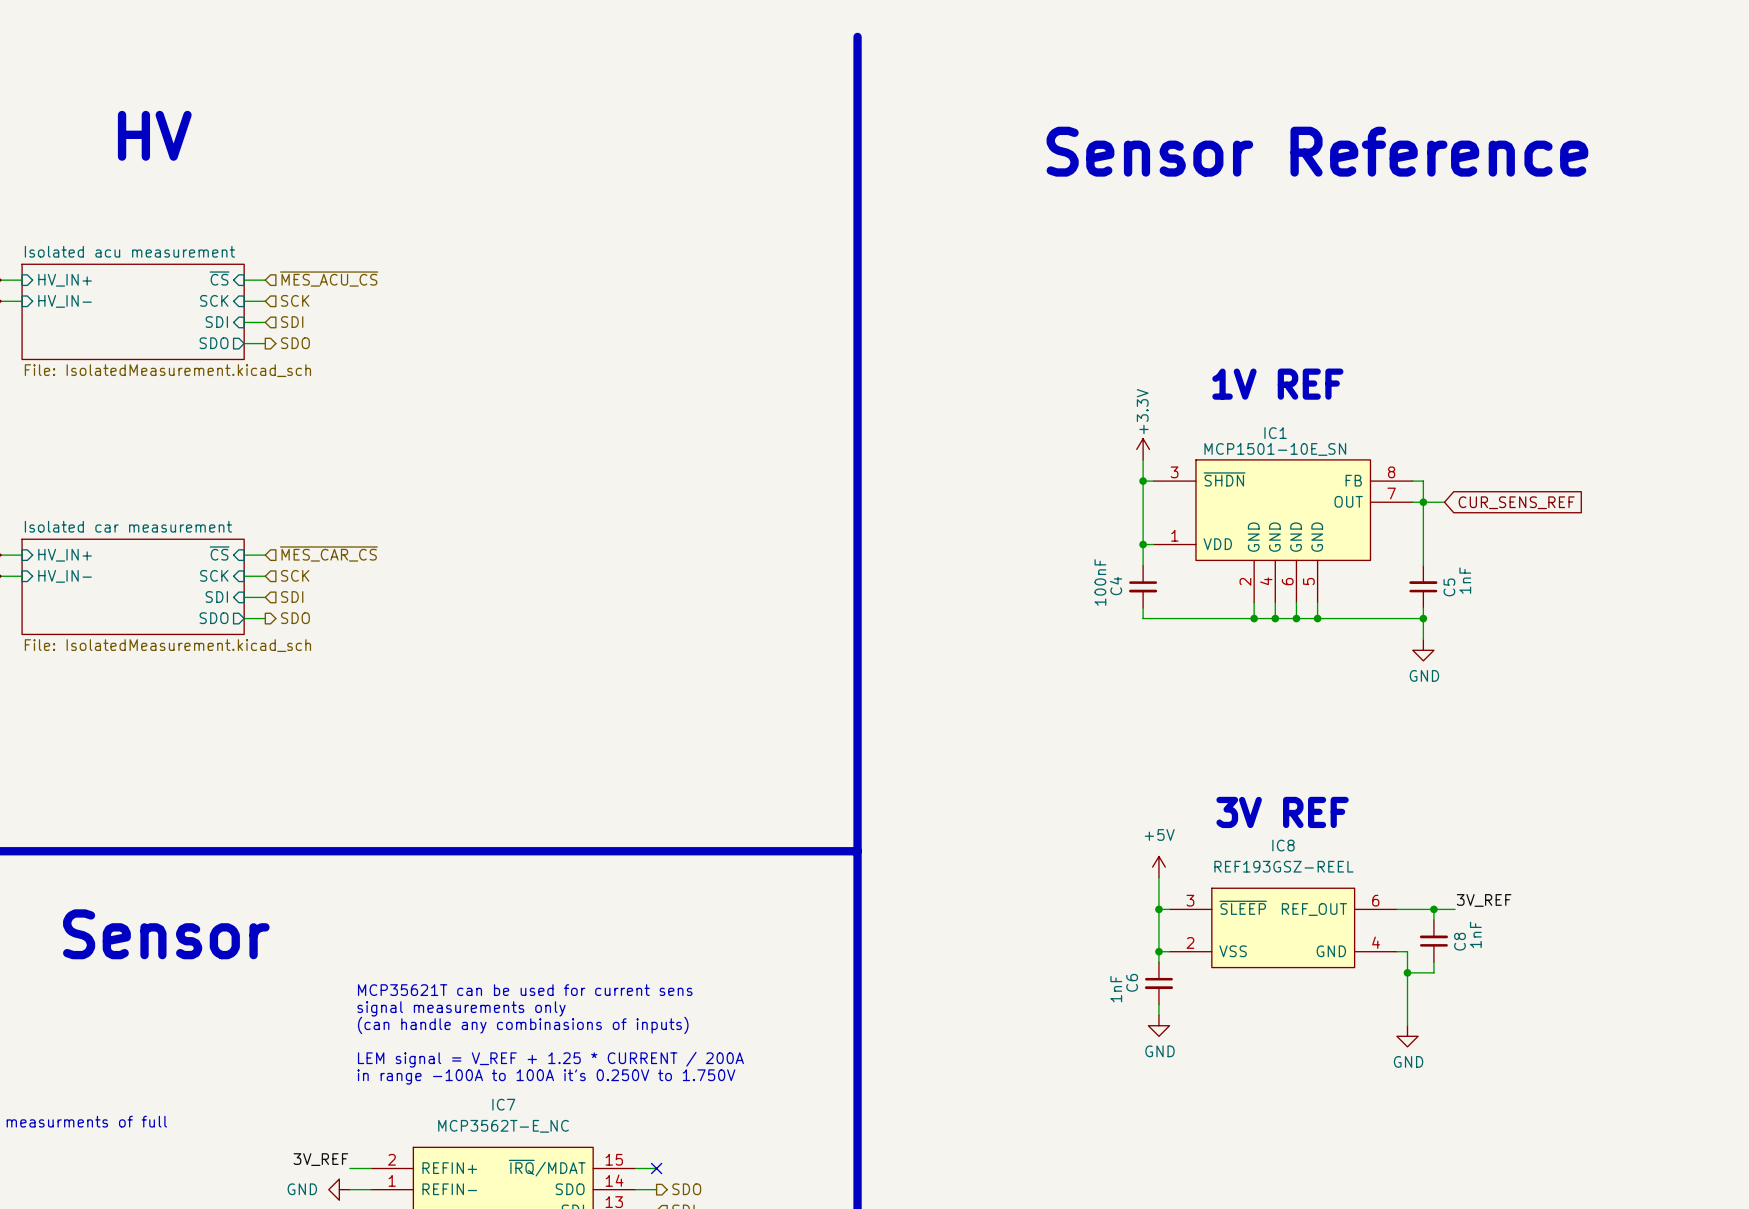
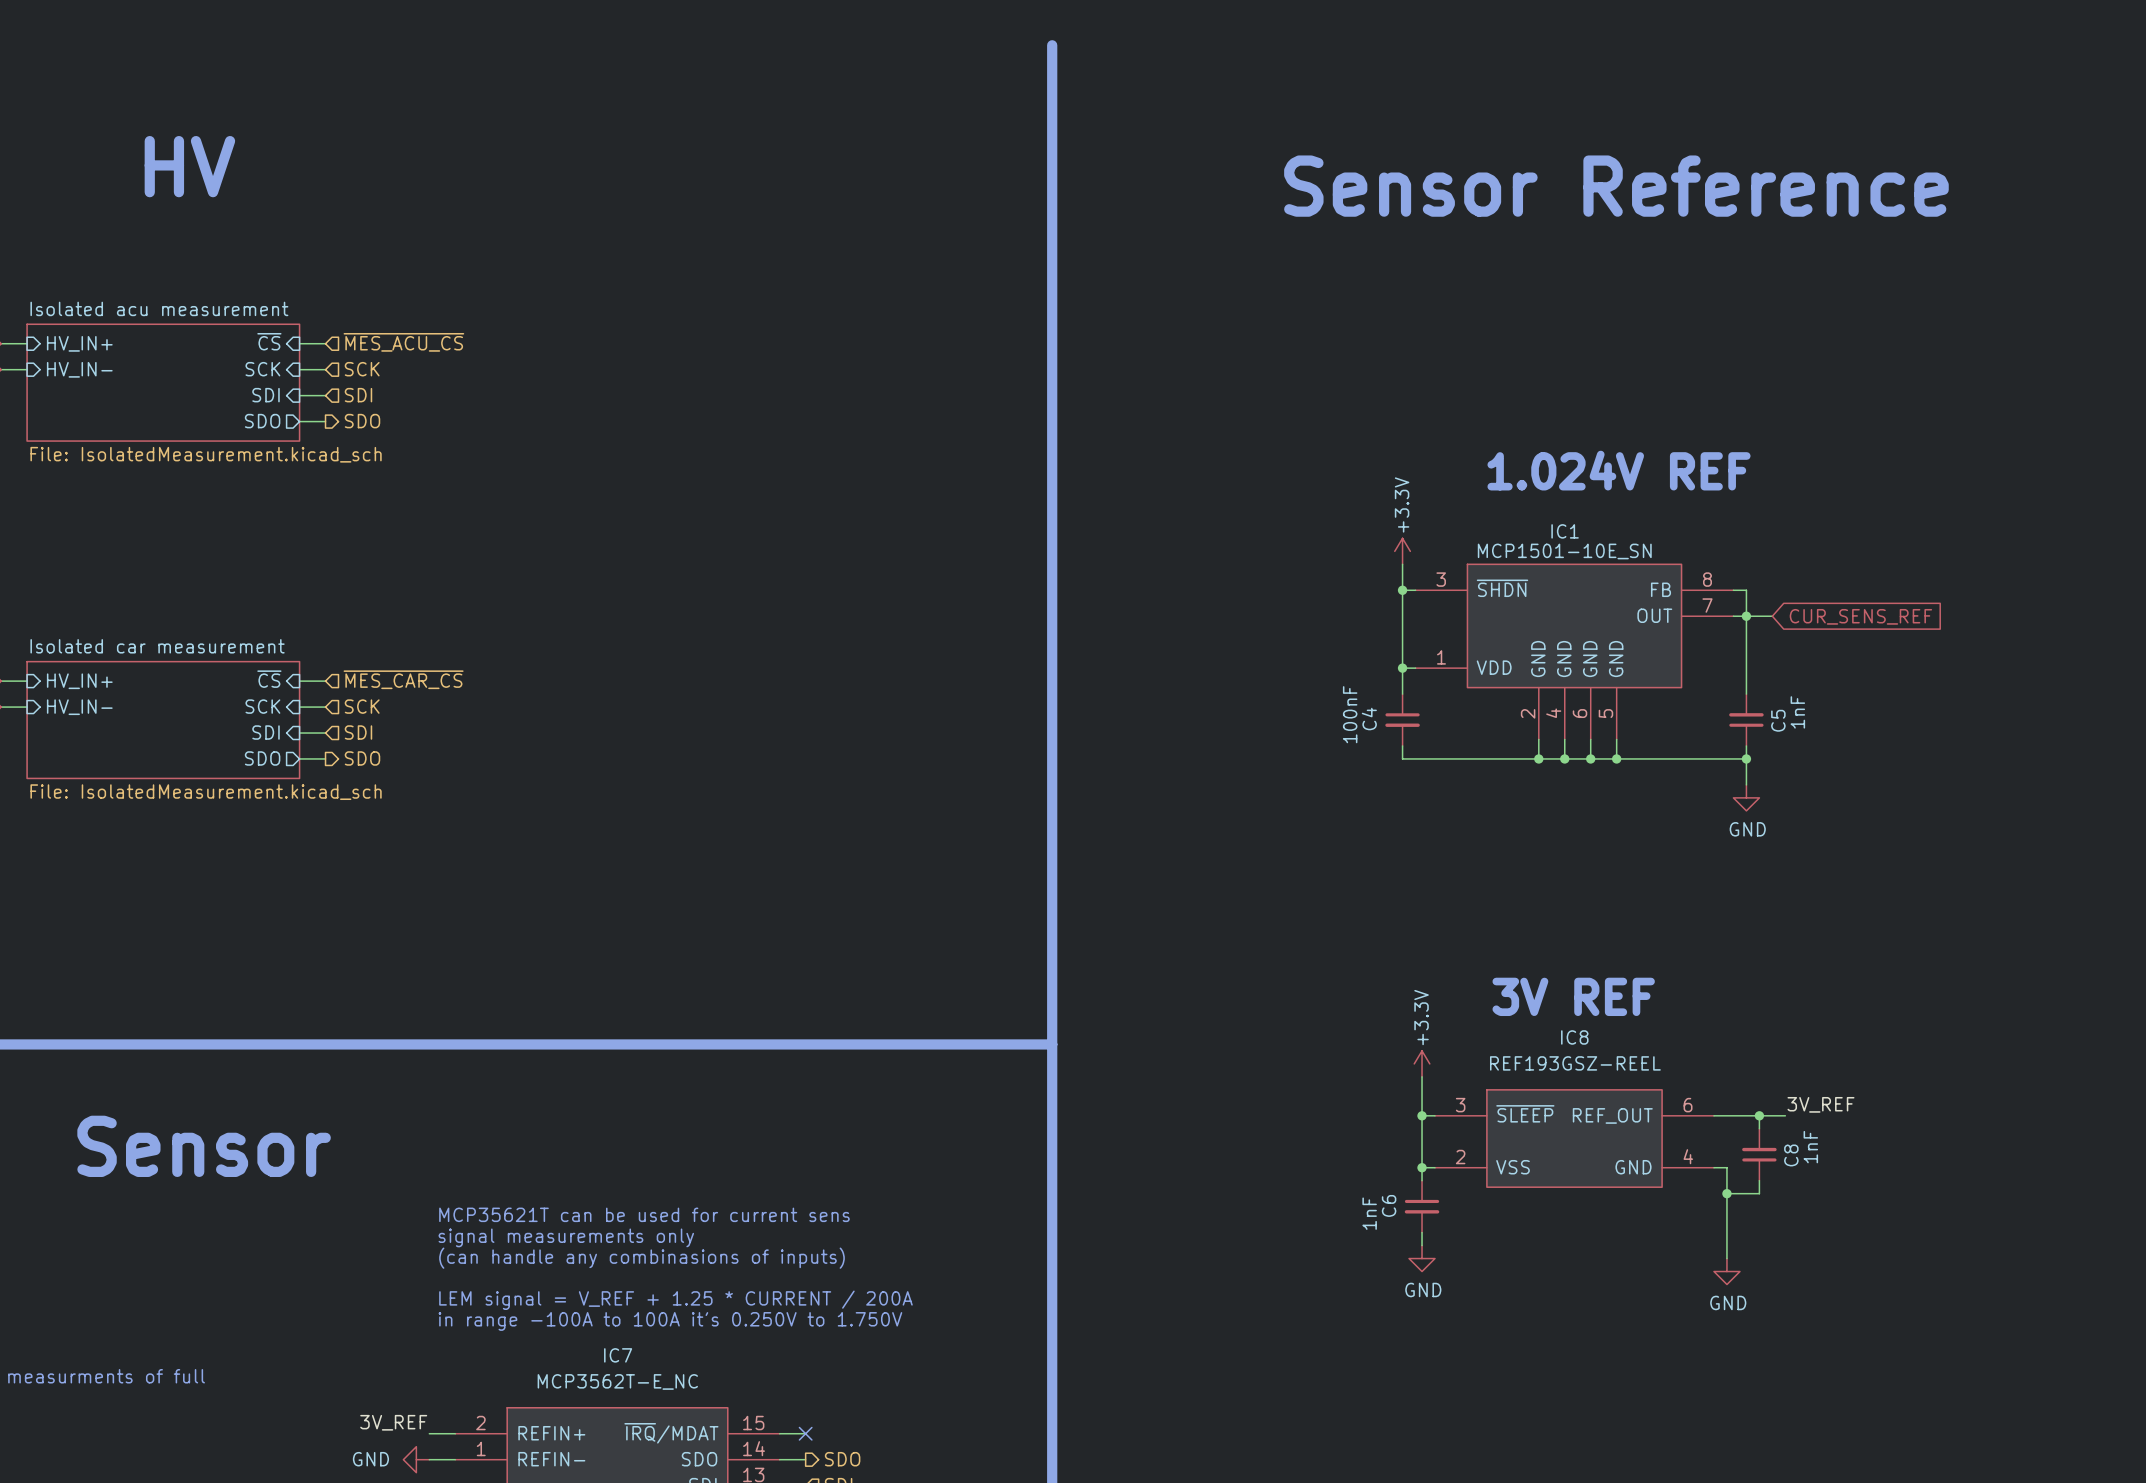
text: 1V REF (1277, 384) -> 1.024V REF (1619, 470)
power symbol: +5V (1158, 867) -> +3.3V (1422, 1063)

